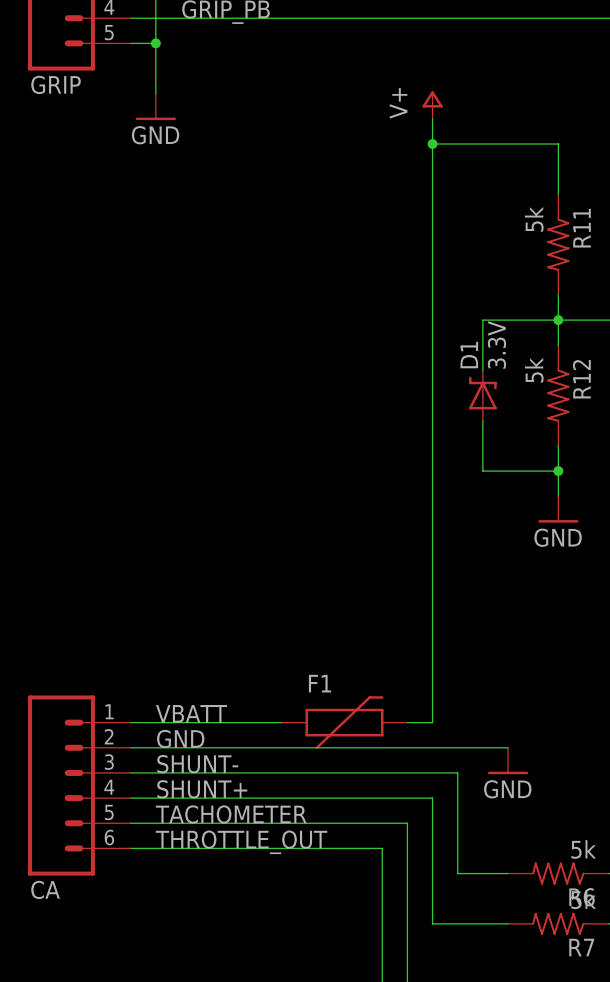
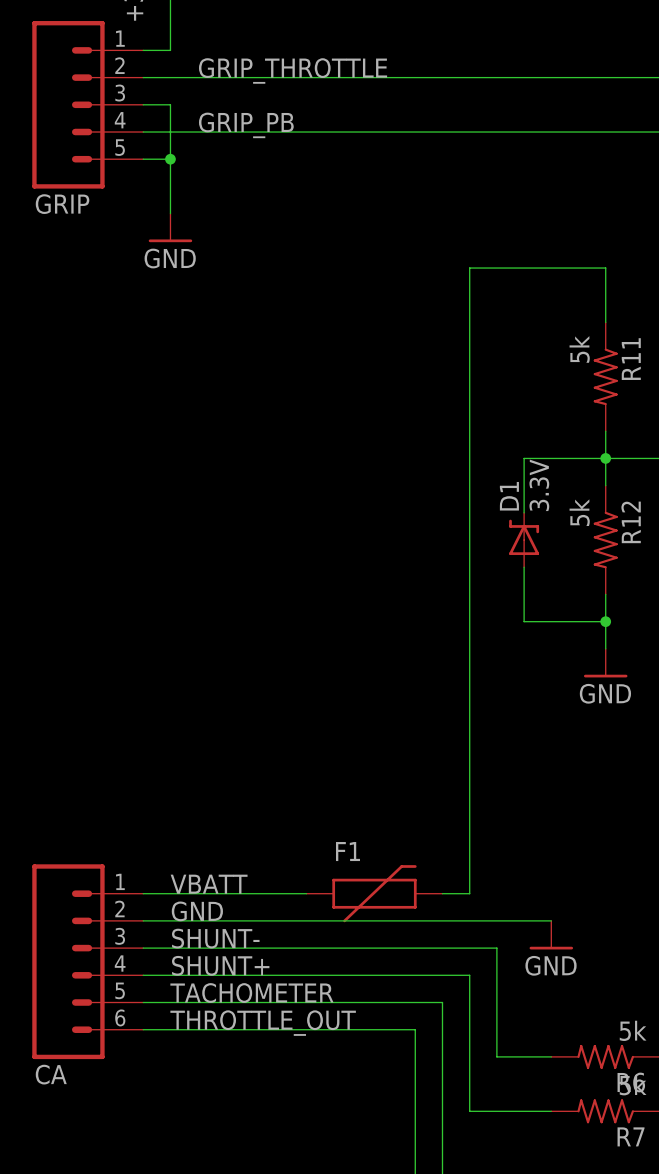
power symbol: V+ (432, 105) -> none
wire: (432, 118) (432, 144) -> none
junction: (432, 144) -> none

